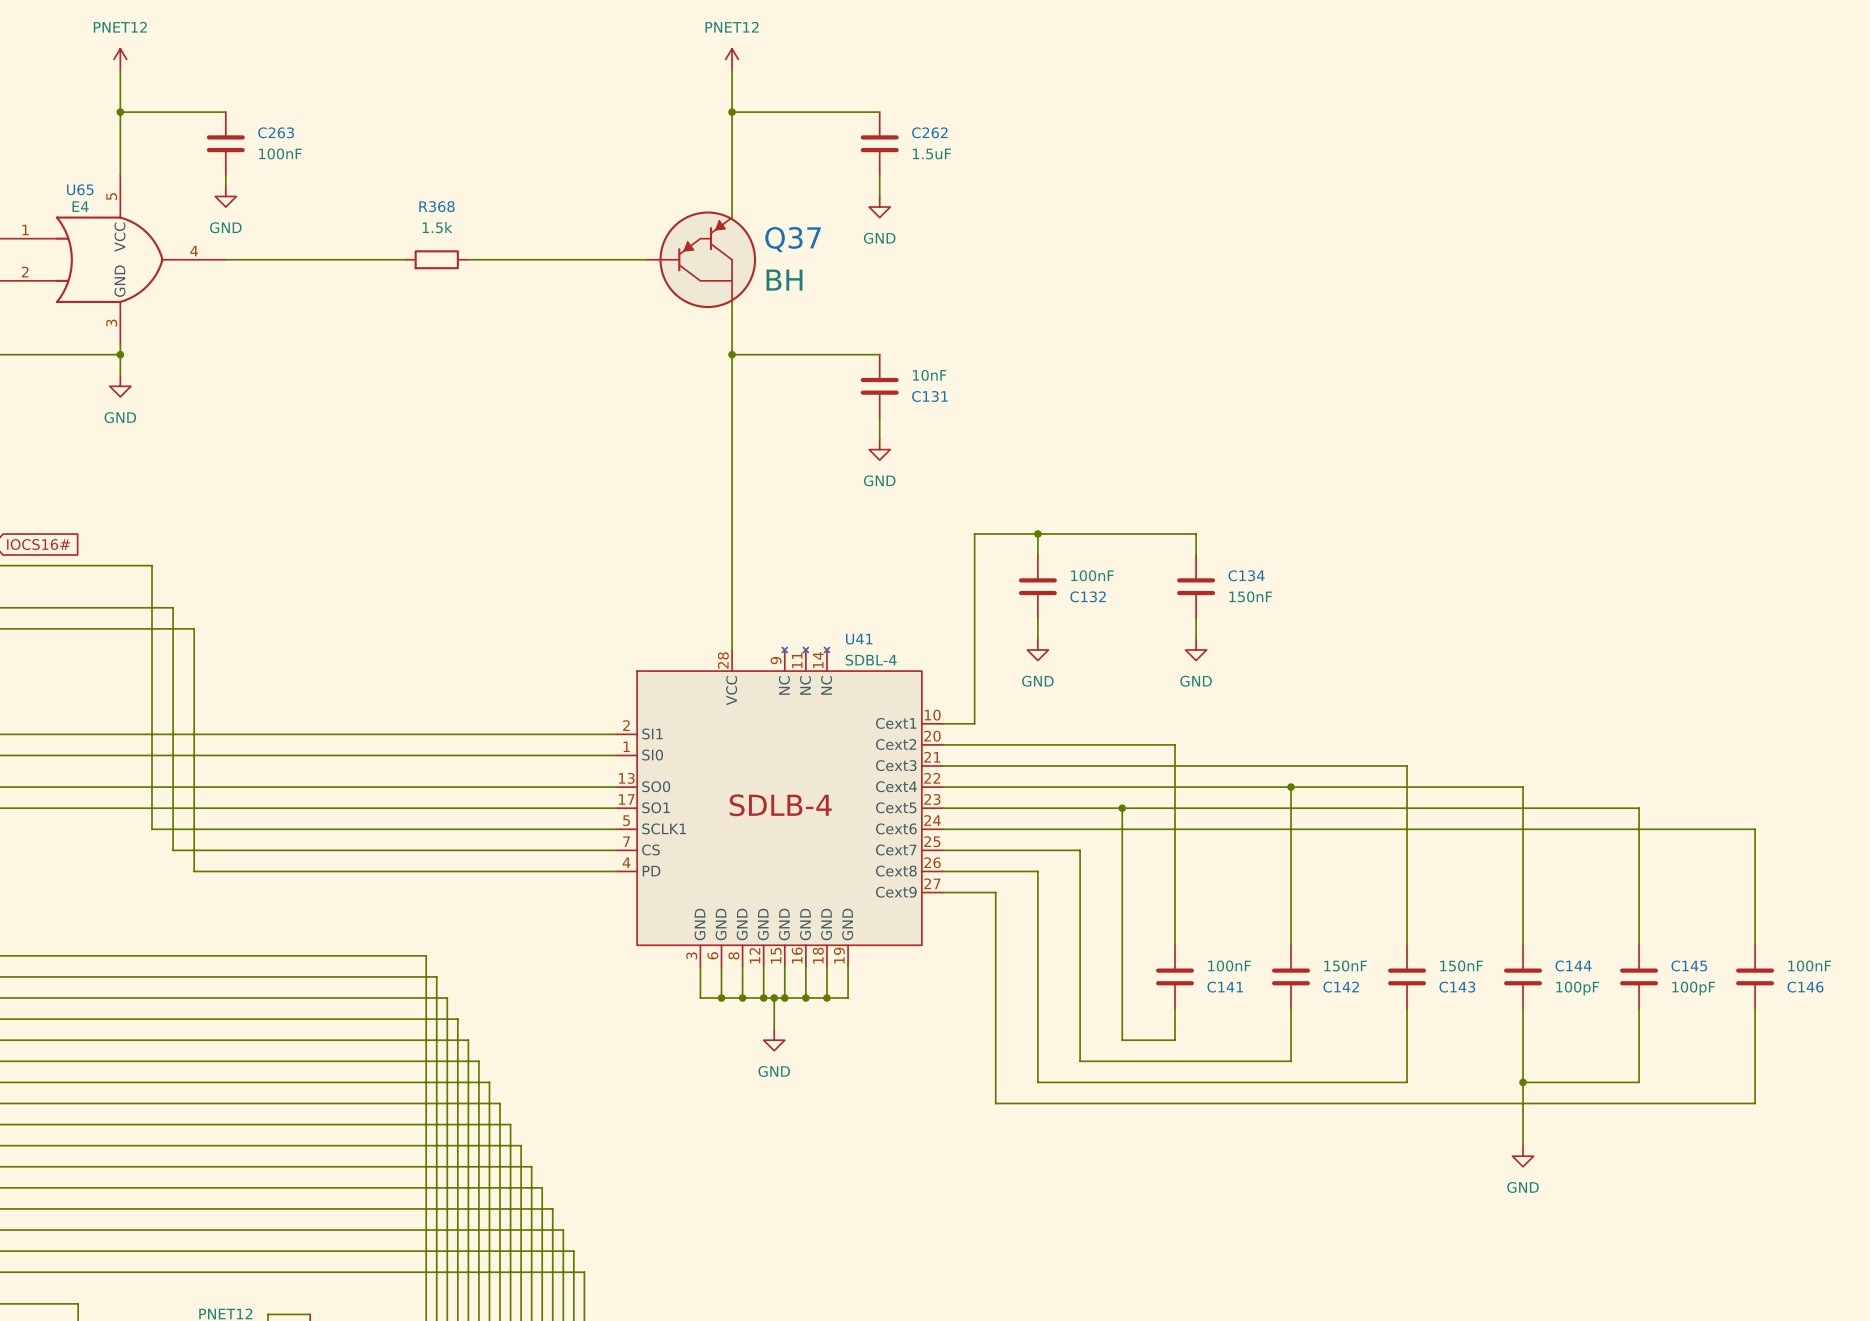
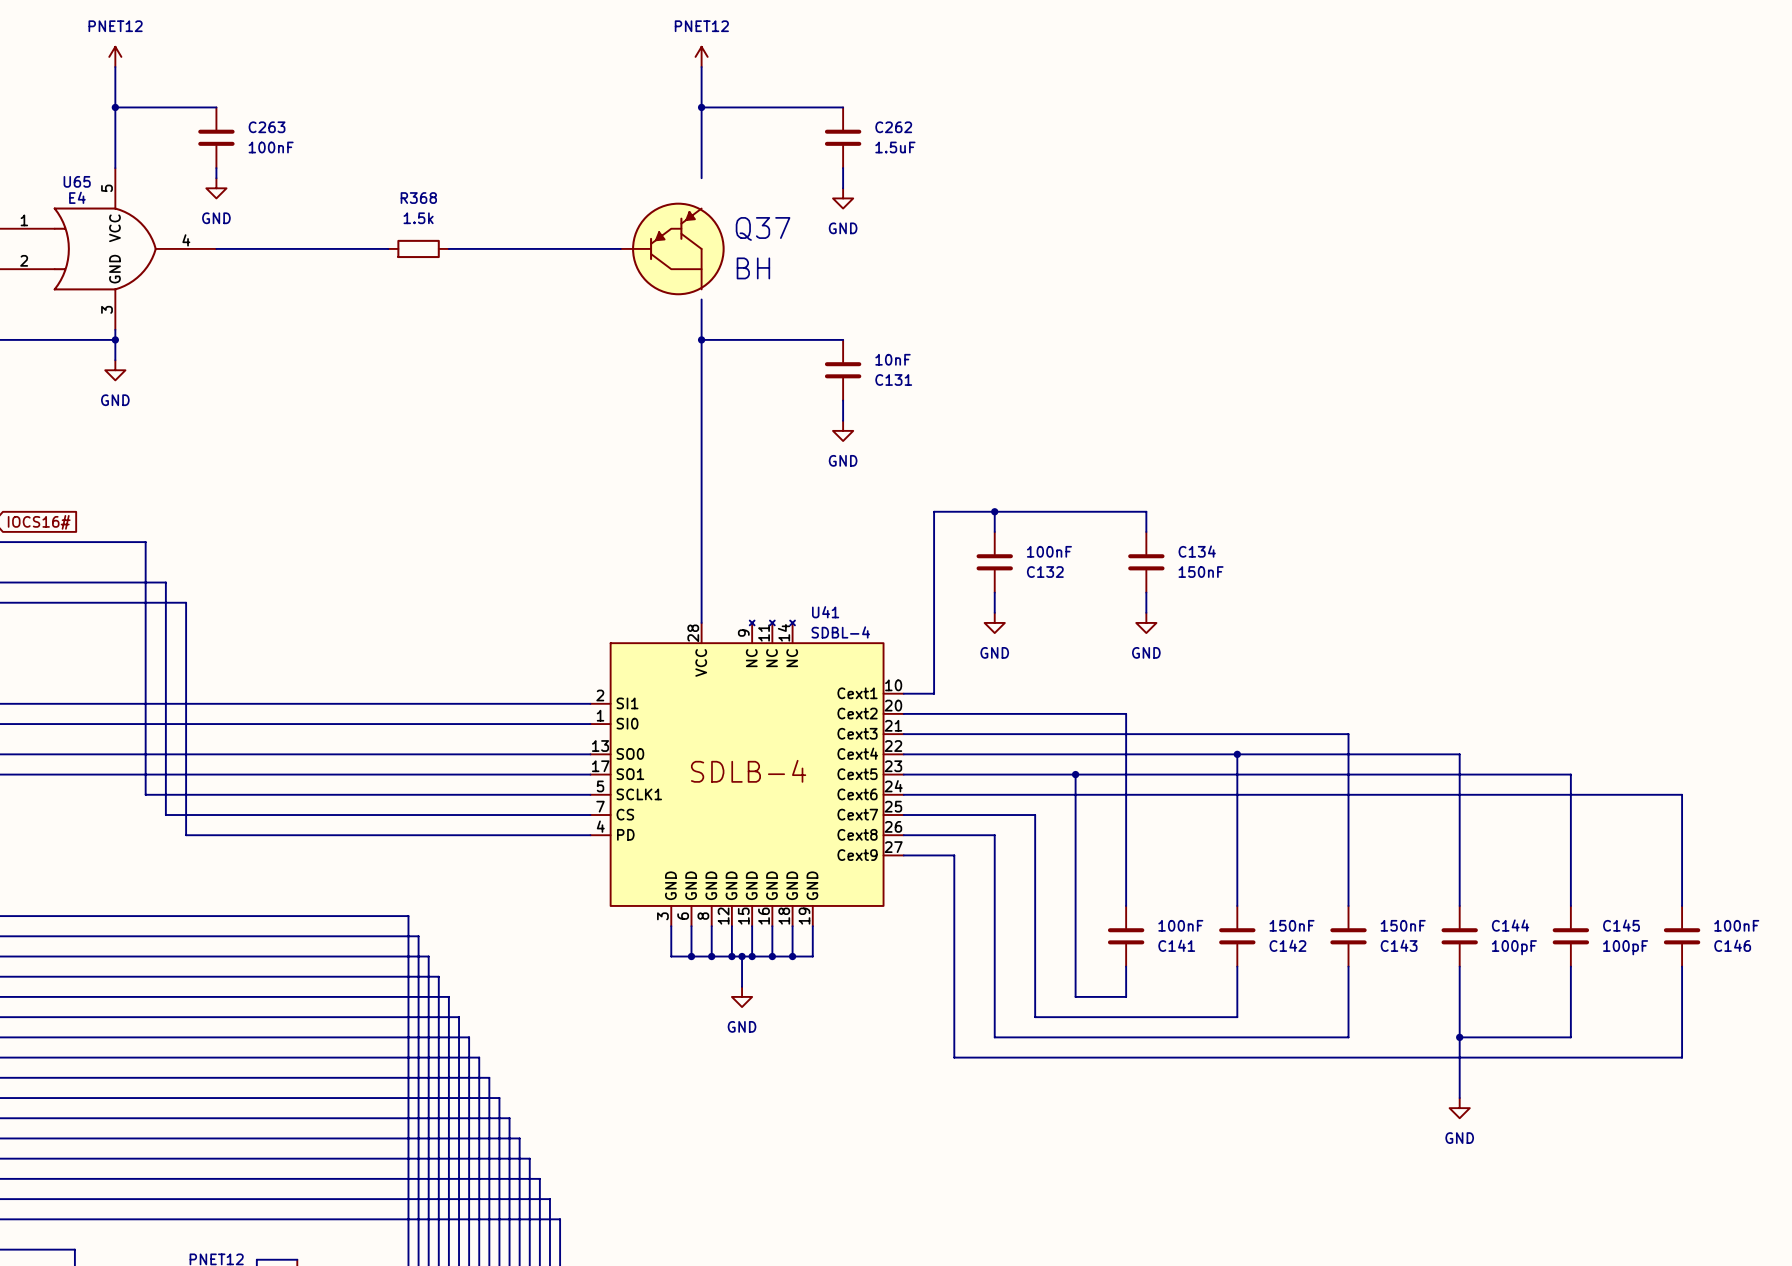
wire: (732, 185) (732, 217) -> none
wire: (732, 301) (732, 312) -> none

